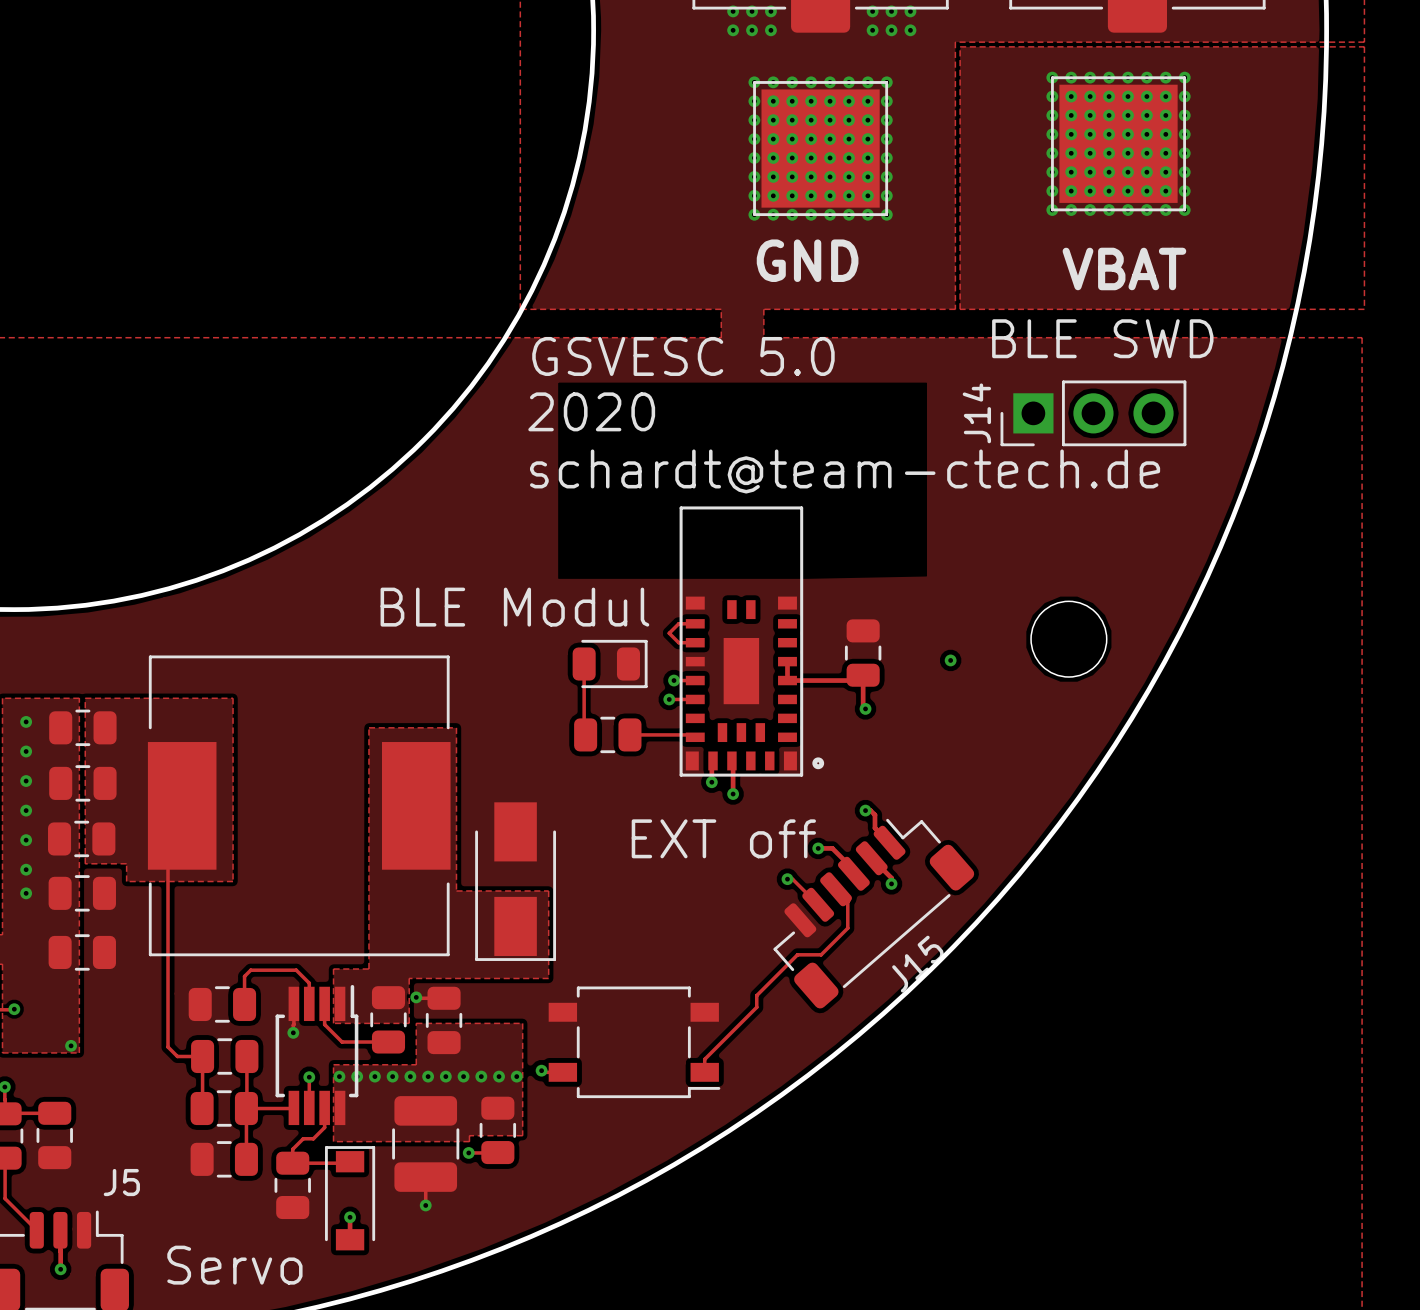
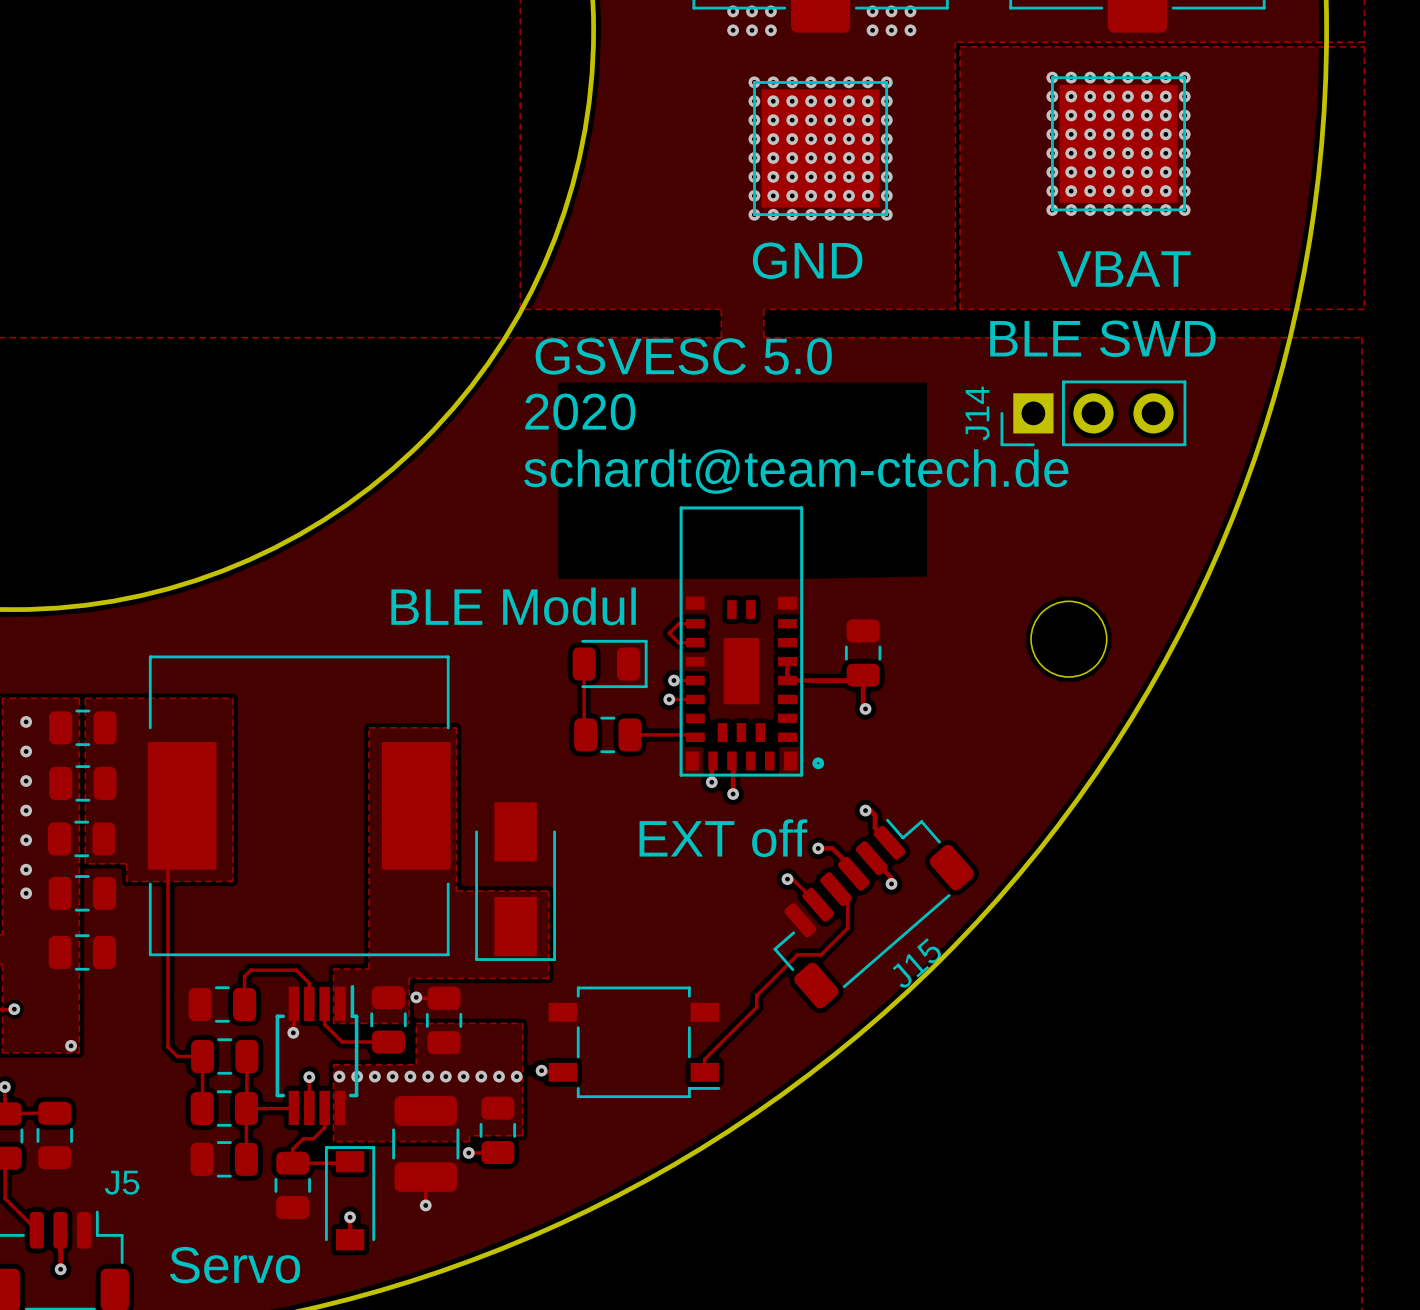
via: (950, 660) -> none

